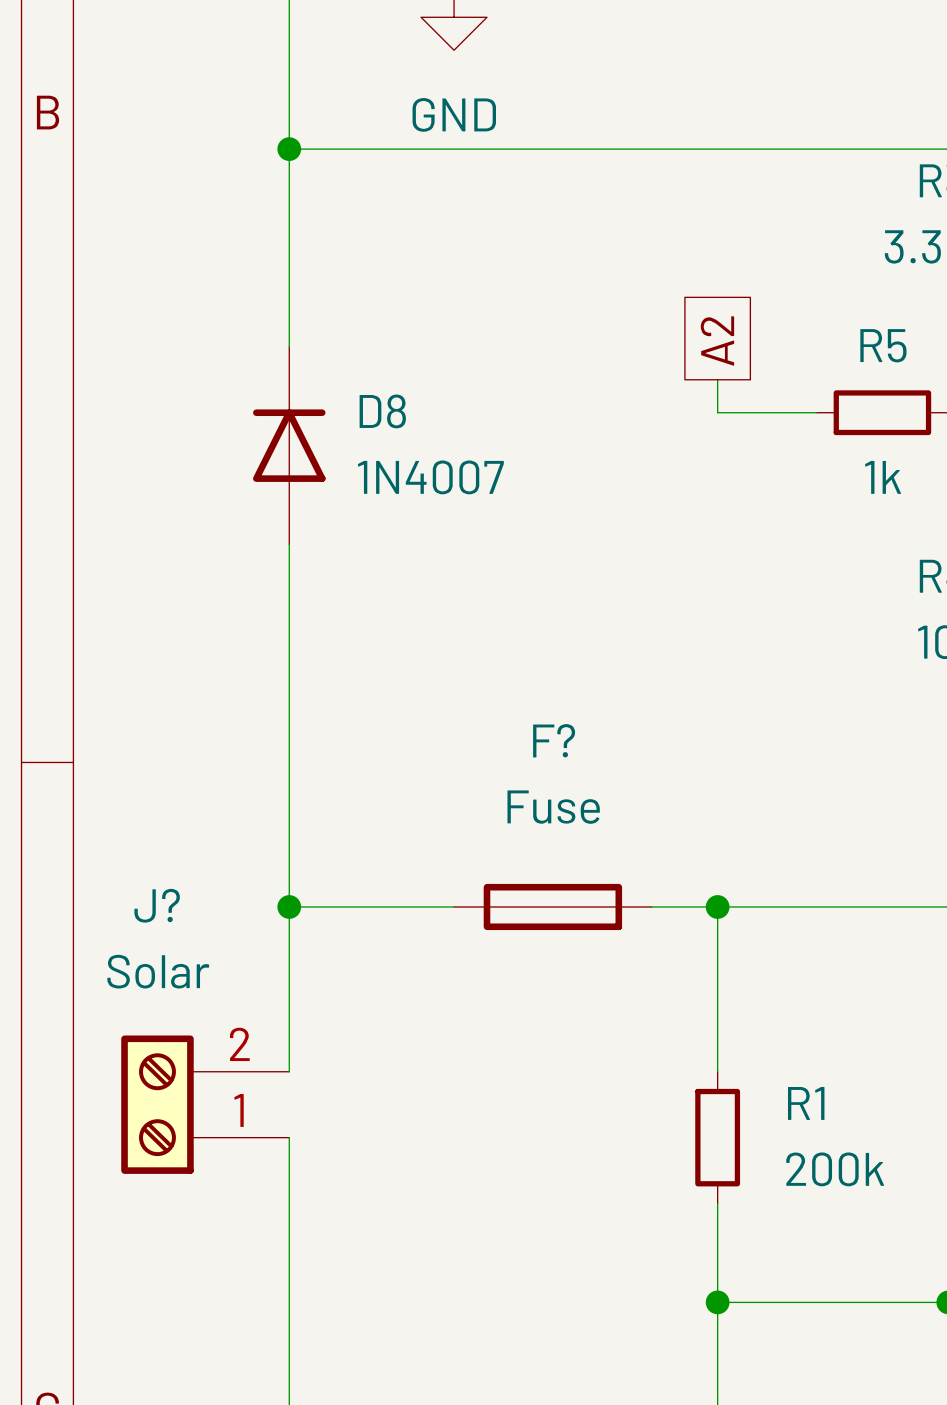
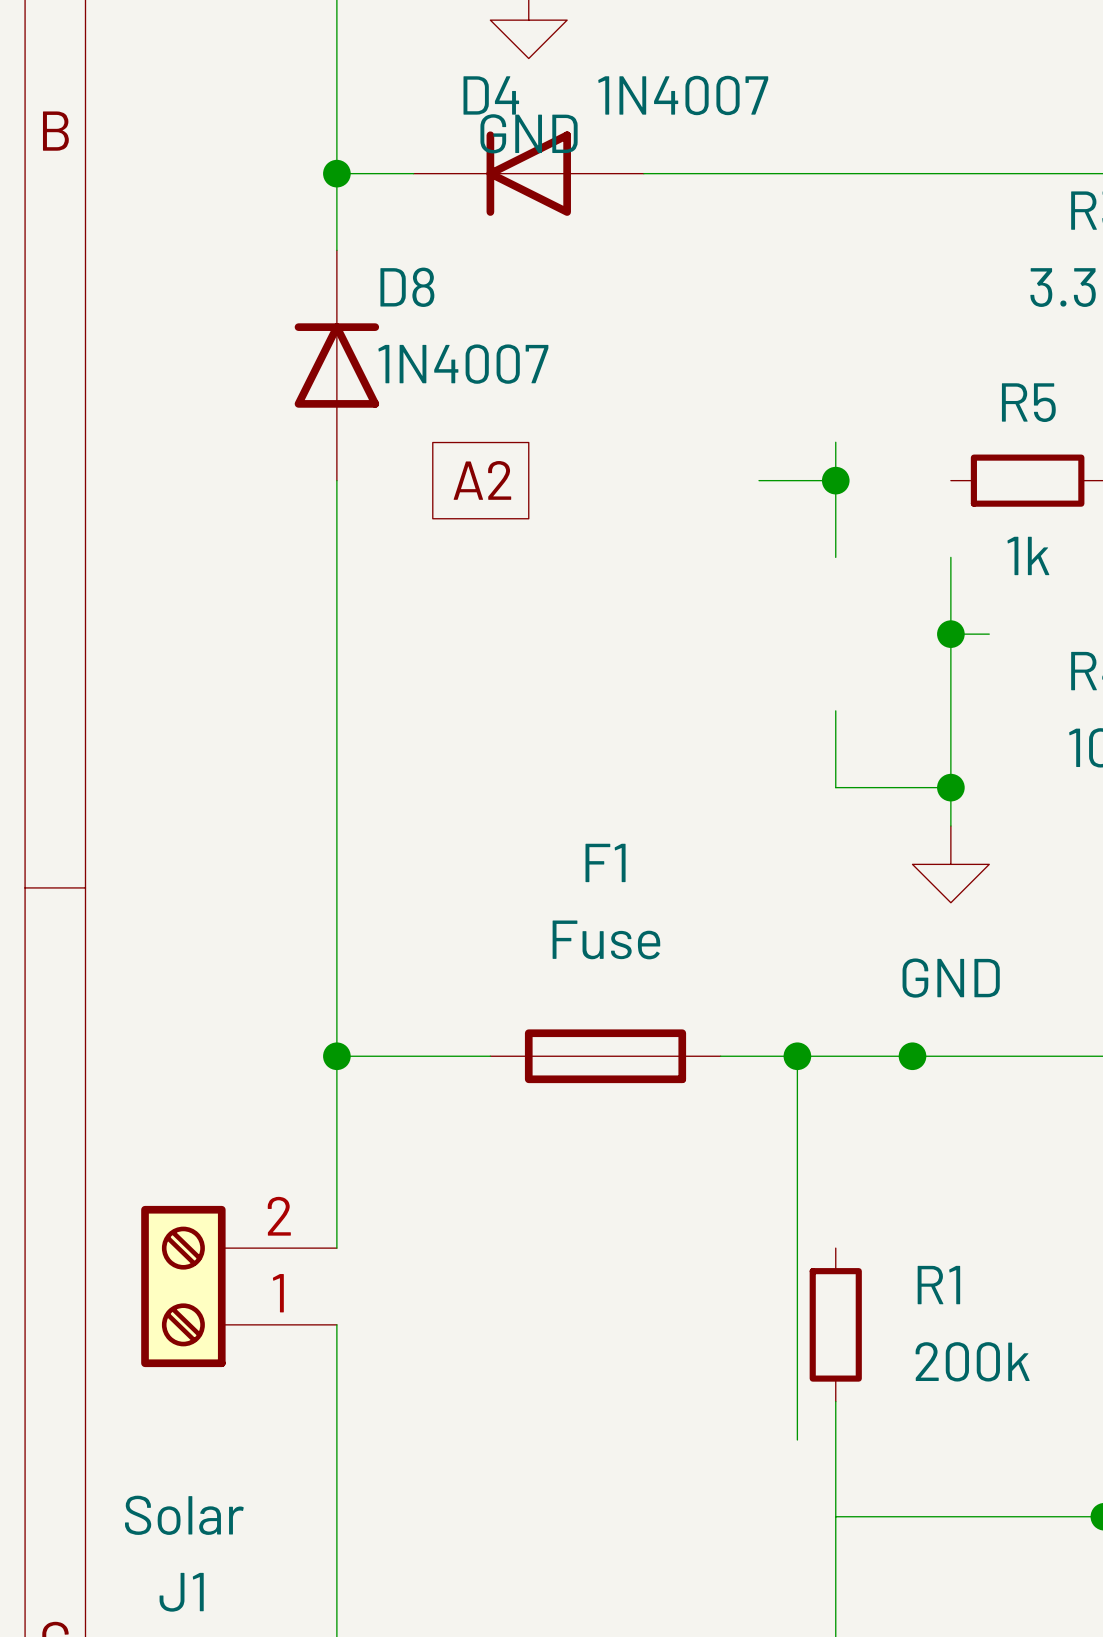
D4: none -> 1N4007 (528, 173)
global label rotation: 0° (717, 341) -> 90° counterclockwise (482, 480)
global label position: A2 (717, 341) -> A2 (482, 480)
D8 name position: D8 (382, 411) -> D8 (407, 287)
wire: none -> (759, 480) (835, 480) (835, 557)
wire: (717, 412) (816, 412) -> none
junction: none -> (835, 480)
D8 position: (289, 445) -> (336, 365)
D8 value position: 1N4007 (430, 477) -> 1N4007 (463, 364)
wire: none -> (950, 557) (950, 826)
wire: none -> (950, 634) (989, 634)
junction: none -> (950, 634)
wire: none -> (835, 710) (835, 787) (950, 787)
junction: none -> (950, 787)
power symbol: none -> GND (950, 864)
J? name: J? (157, 905) -> J1 (181, 1592)
F1: none -> Fuse (605, 1056)
F?: Fuse (552, 906) -> none
wire: none -> (797, 1056) (797, 1439)
junction: none -> (797, 1056)
wire: (717, 906) (717, 1071) -> none
junction: (717, 906) -> none
junction: none -> (912, 1056)
J? value position: Solar (158, 971) -> Solar (184, 1515)
junction: (717, 1302) -> none

